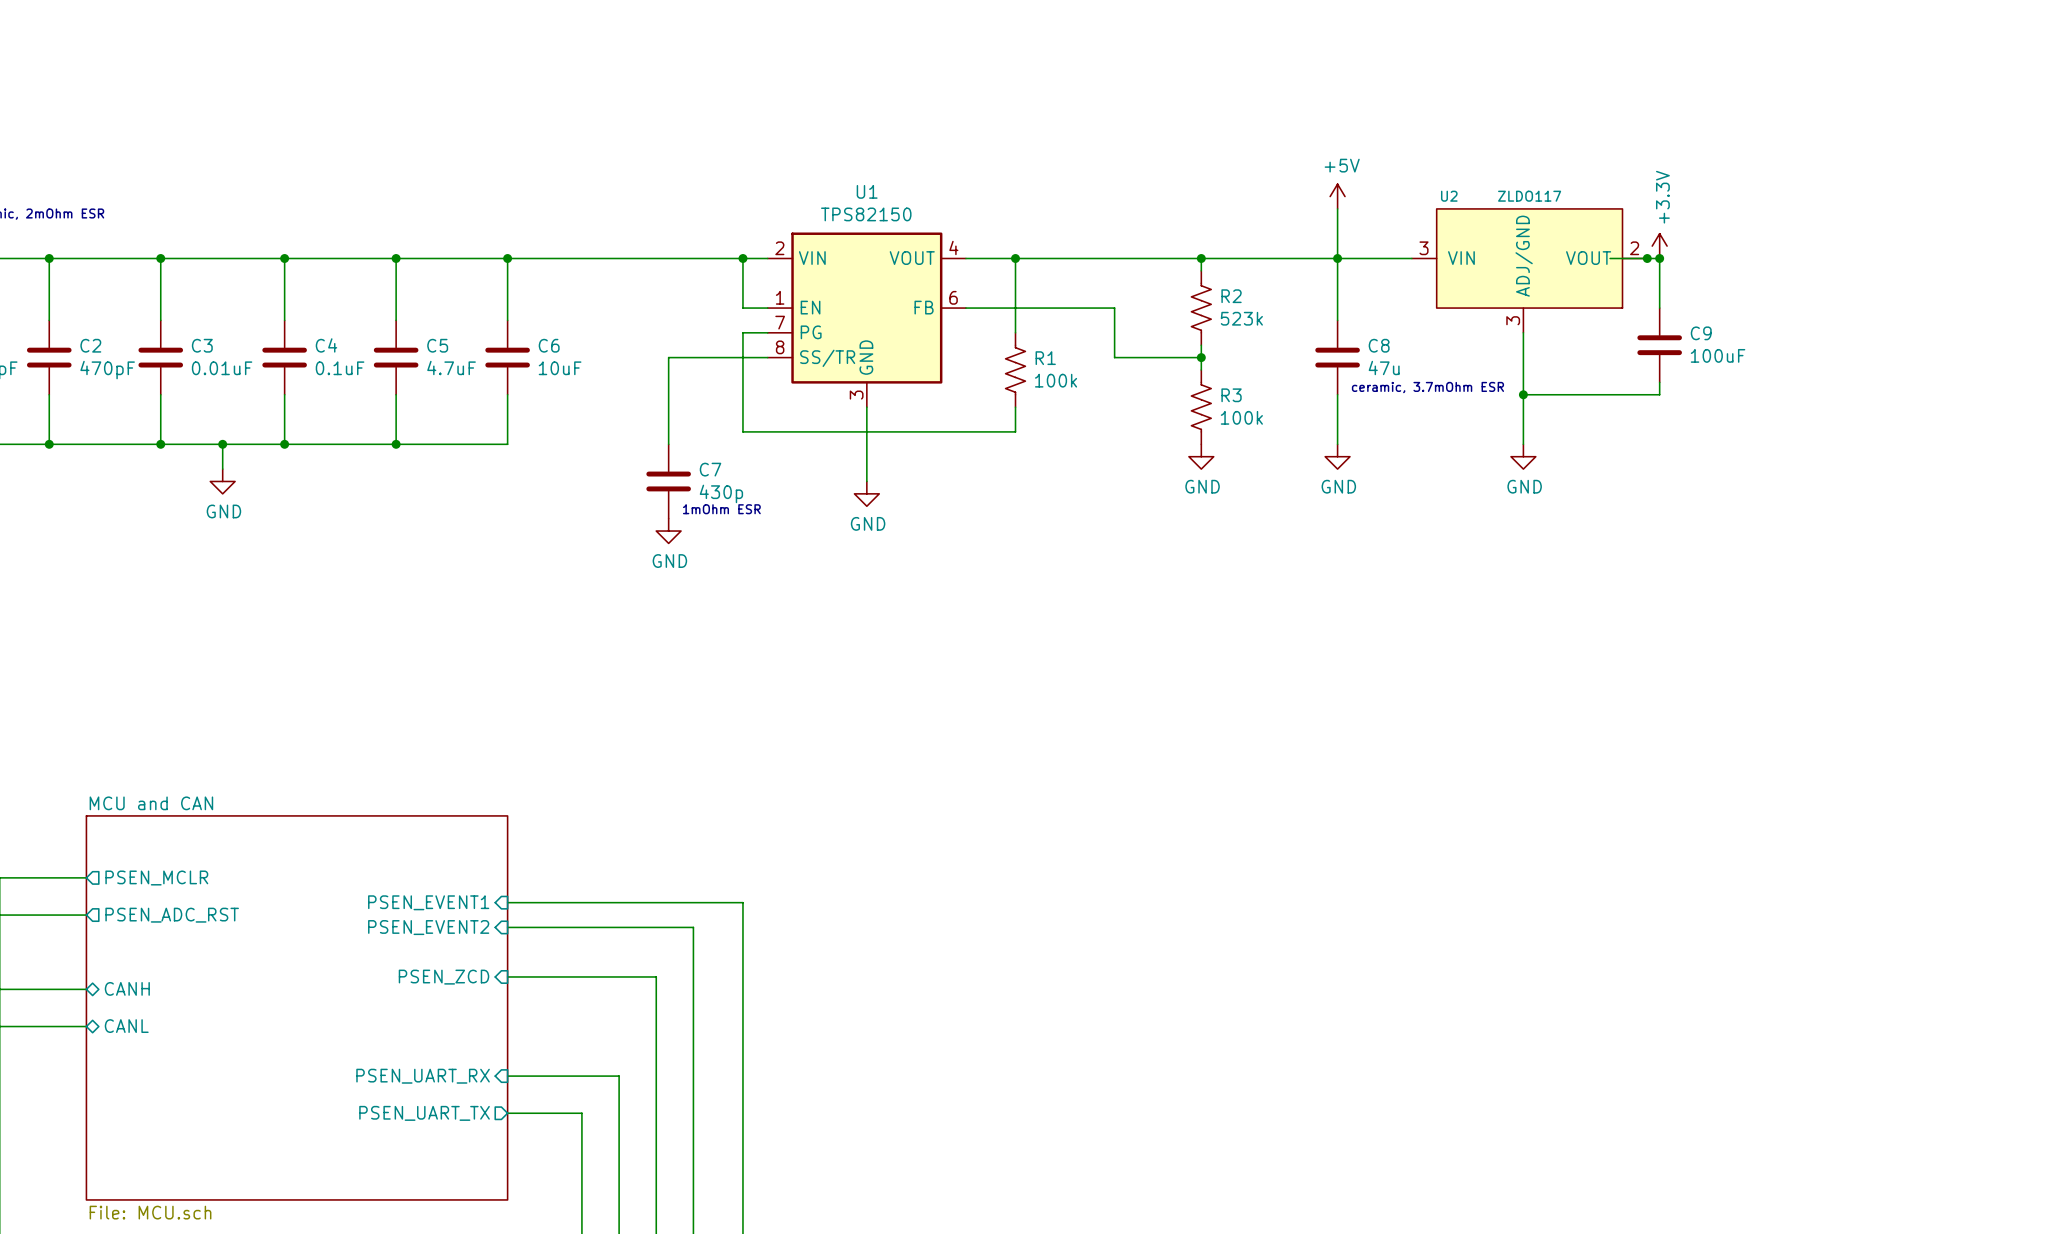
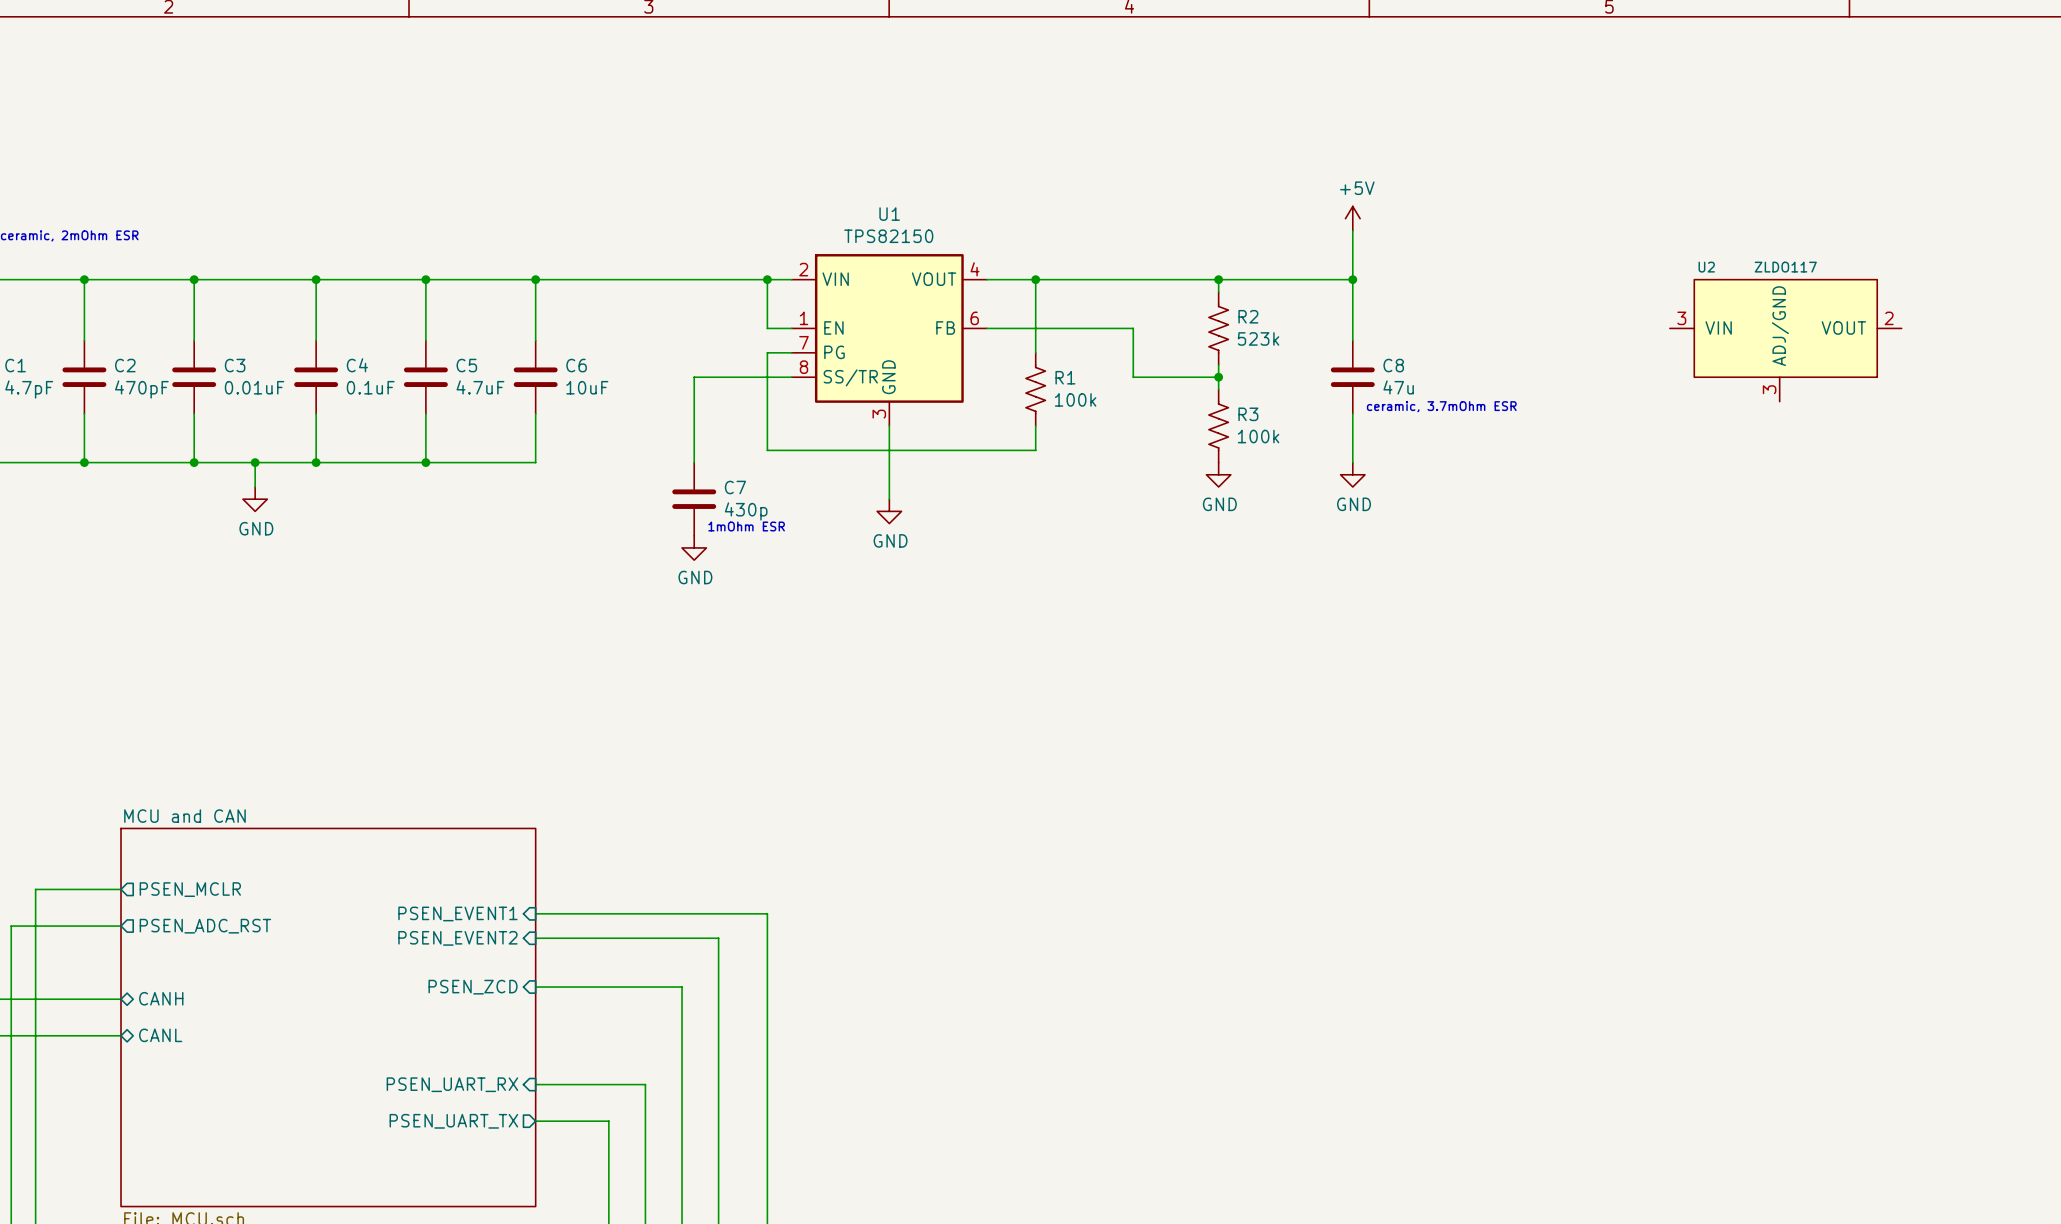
power symbol: +3.3V (1659, 246) -> none
wire: (1337, 258) (1411, 258) -> none
wire: (1610, 258) (1659, 258) (1659, 308) -> none
junction: (1647, 258) -> none
junction: (1659, 258) -> none
U2 position: (1529, 270) -> (1785, 340)
wire: (1523, 332) (1523, 444) -> none
C9: 100uF (1659, 345) -> none
wire: (1659, 382) (1659, 394) (1523, 394) -> none
junction: (1523, 394) -> none
power symbol: GND (1523, 456) -> none

